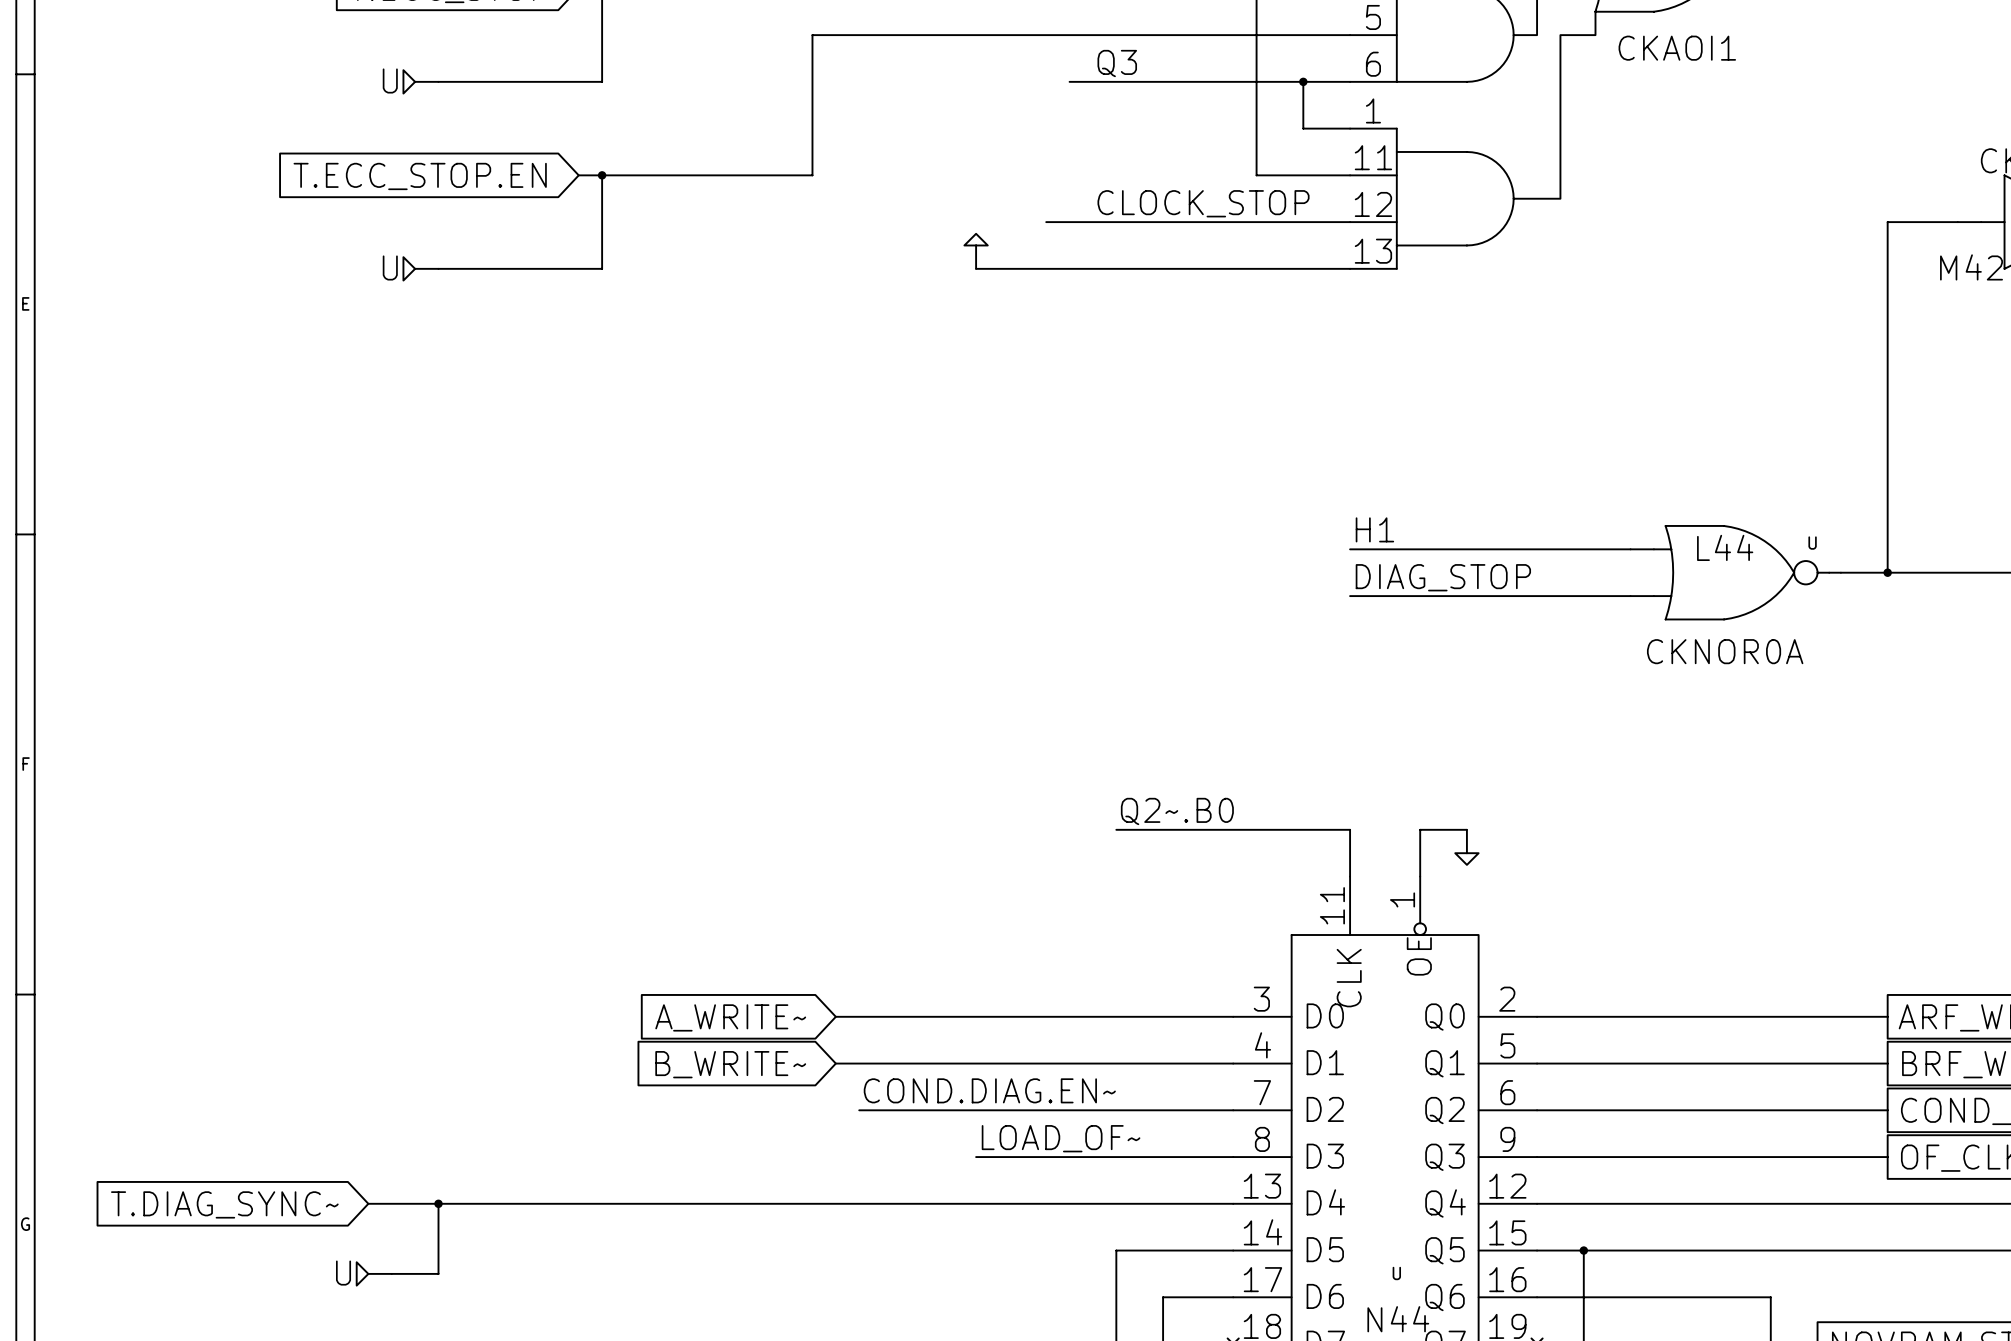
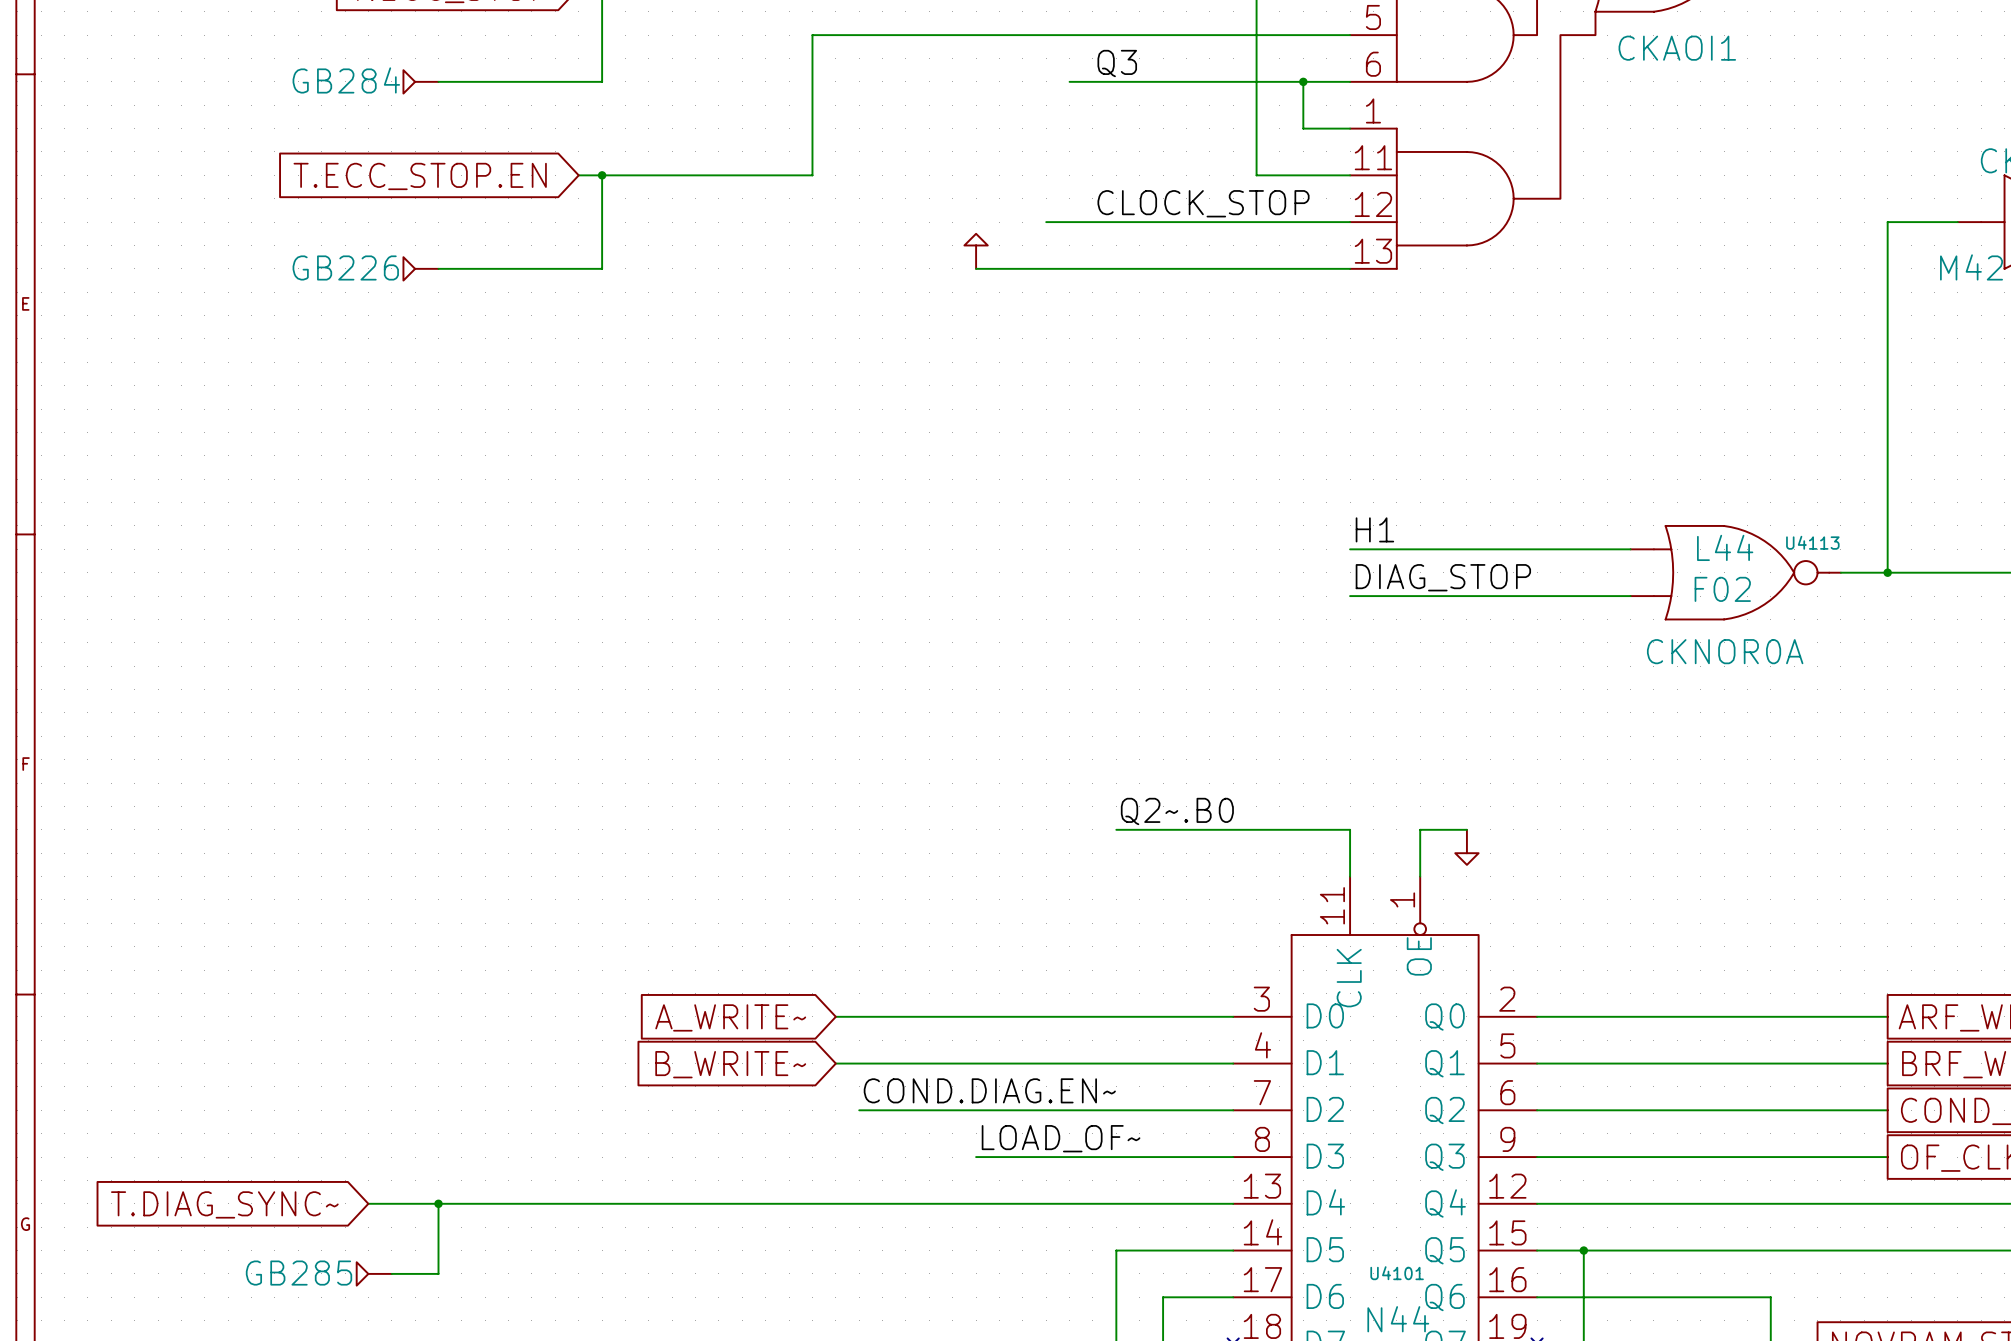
U name: U (390, 80) -> GB284 (346, 80)
U name: U (390, 267) -> GB226 (345, 267)
U name: U (1812, 543) -> U4113 (1812, 542)
U value: none -> F02 (1722, 589)
U name: U (343, 1273) -> GB285 (299, 1273)
U name: U (1396, 1273) -> U4101 (1397, 1273)

